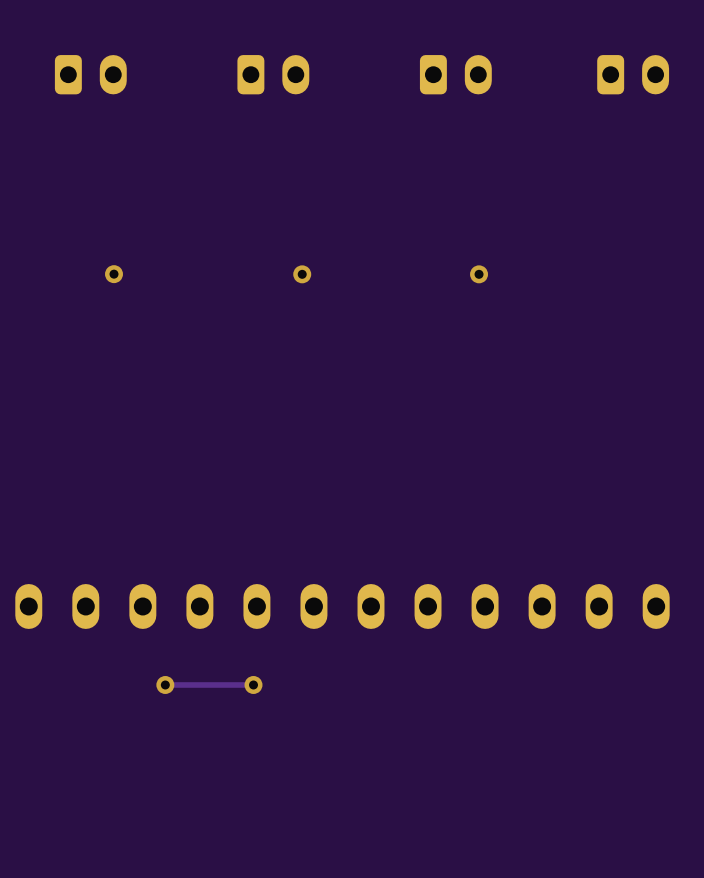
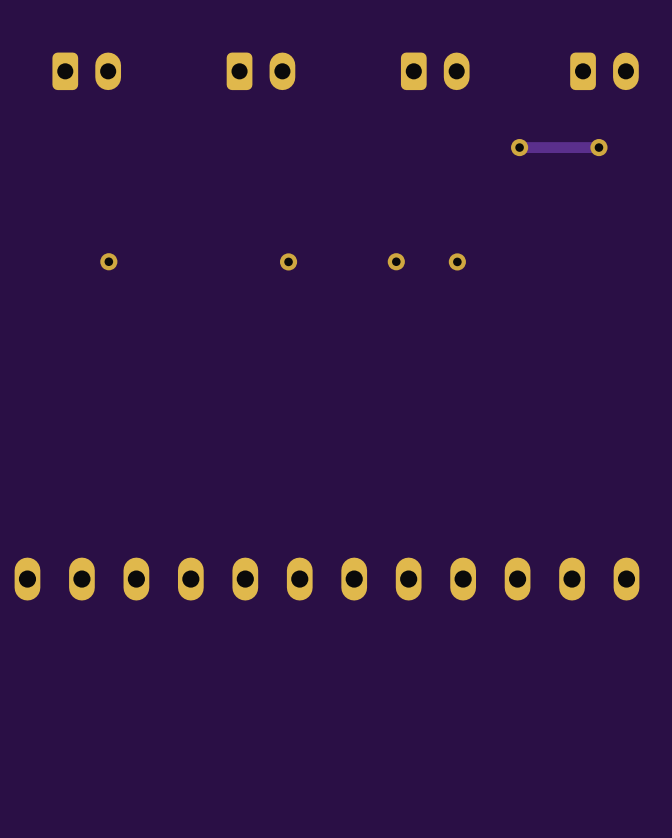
via: none -> (519, 147)
track: none -> (598, 147) (519, 147)
via: none -> (598, 147)
via: none -> (396, 261)
via: (165, 684) -> none
track: (253, 684) (165, 684) -> none
via: (253, 684) -> none

